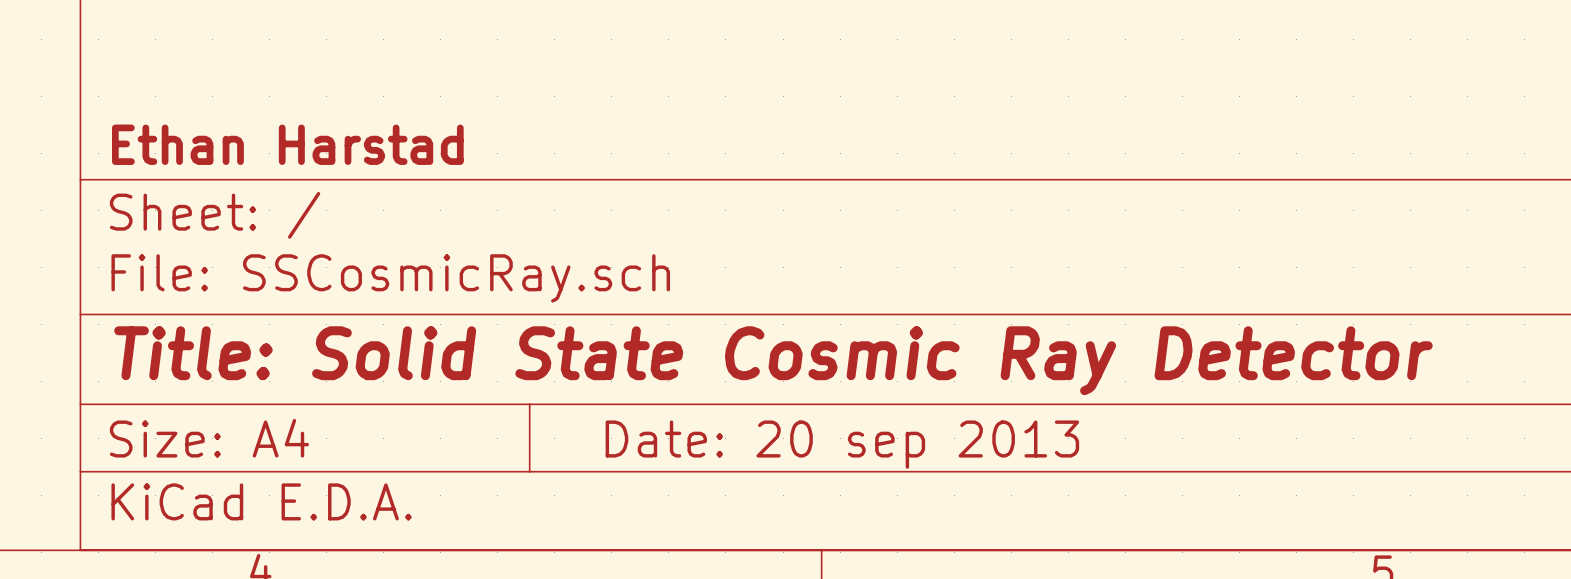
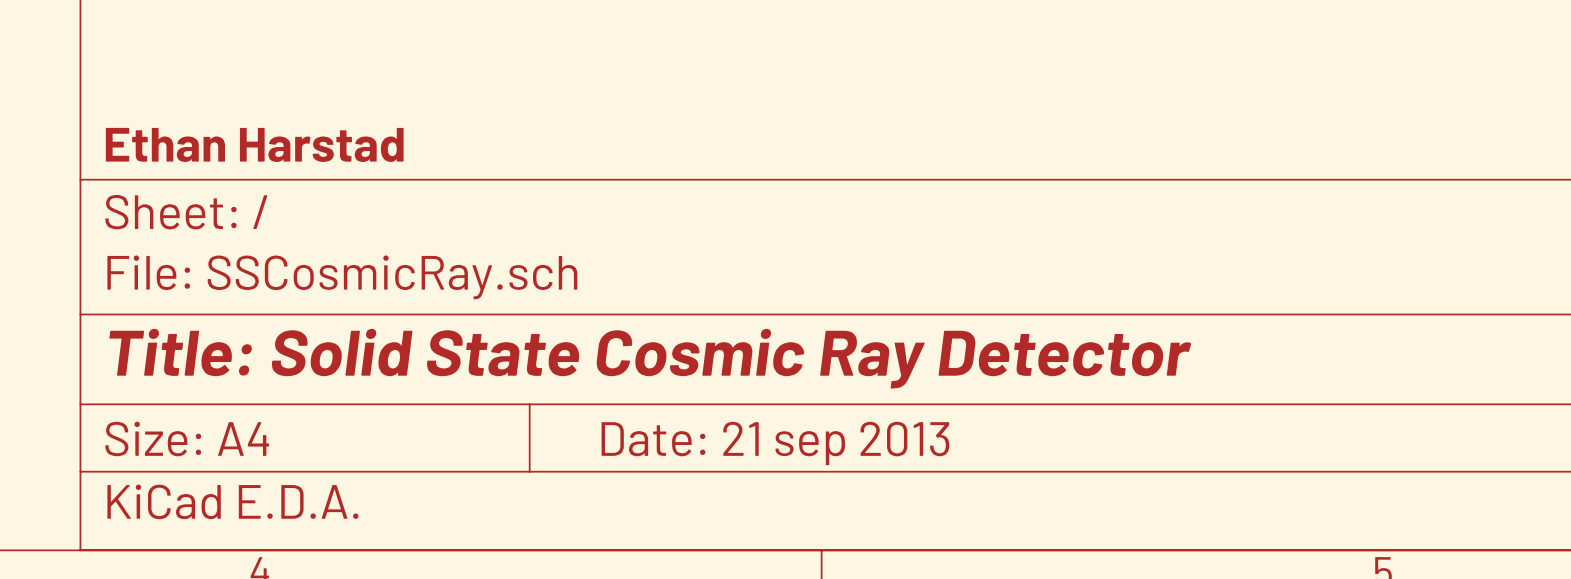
title block: Date: 20 sep 2013 (842, 444) -> Date: 21 sep 2013 (775, 443)

